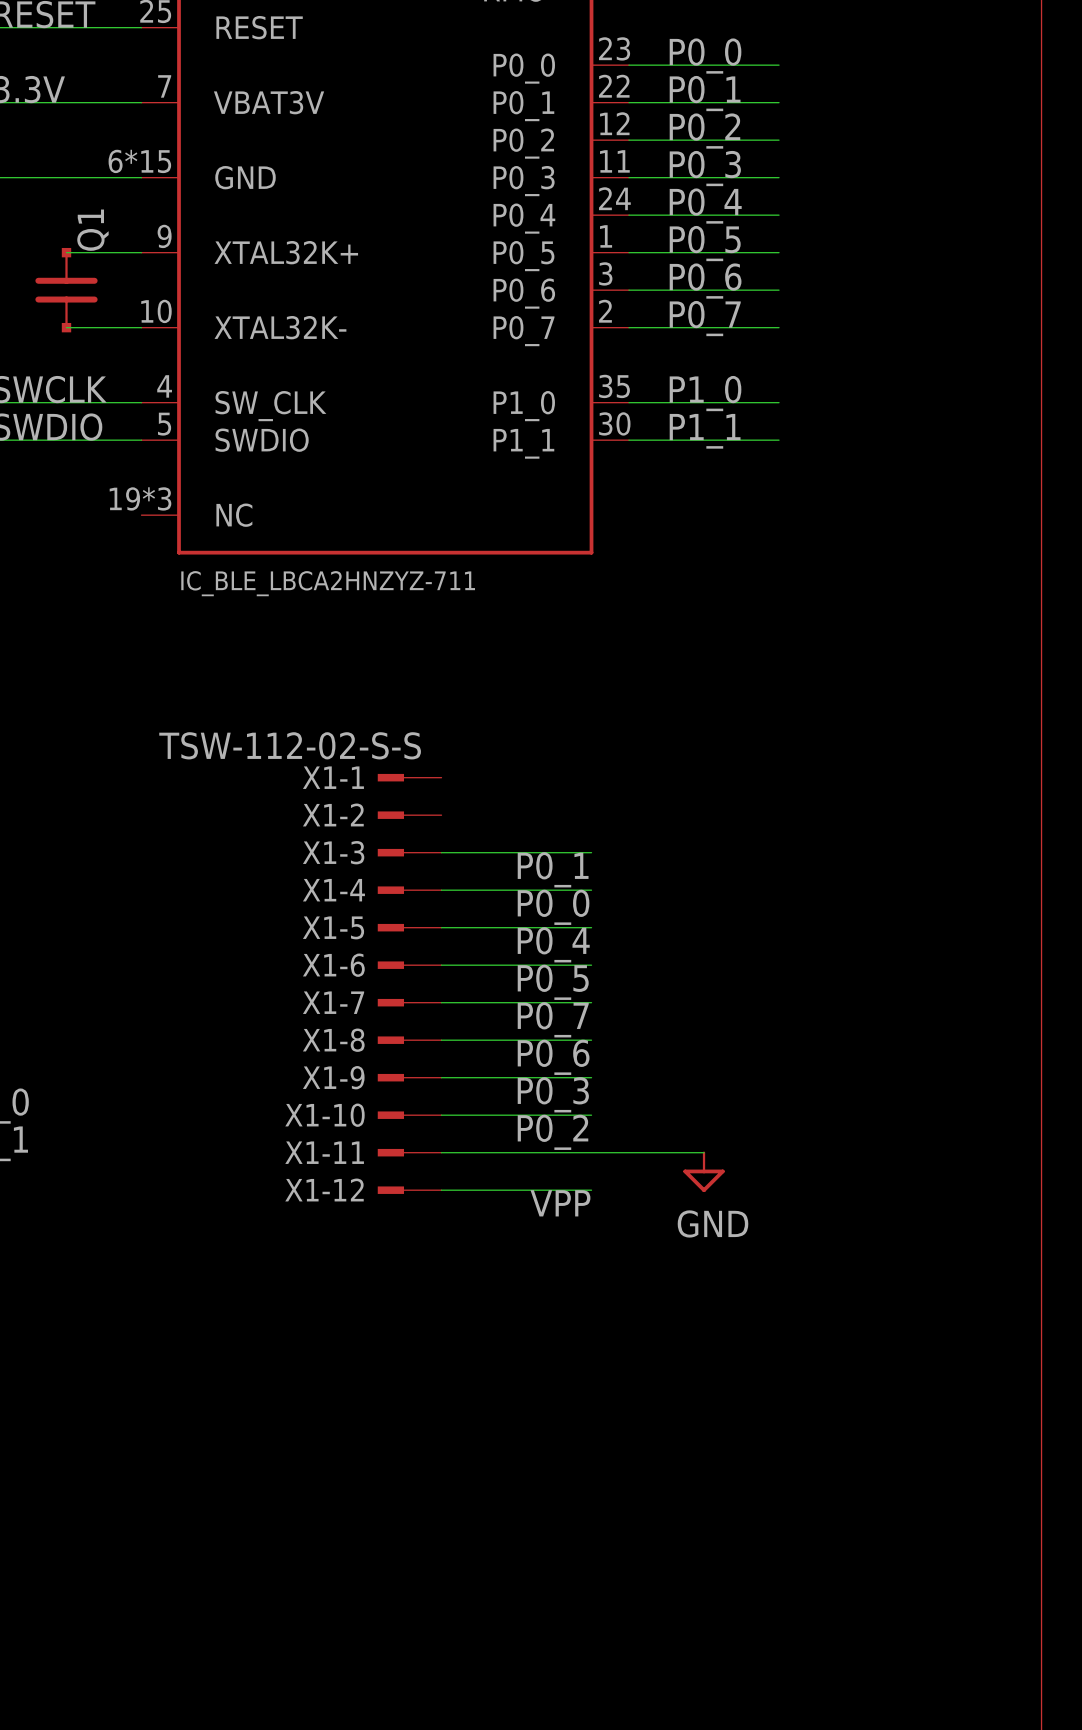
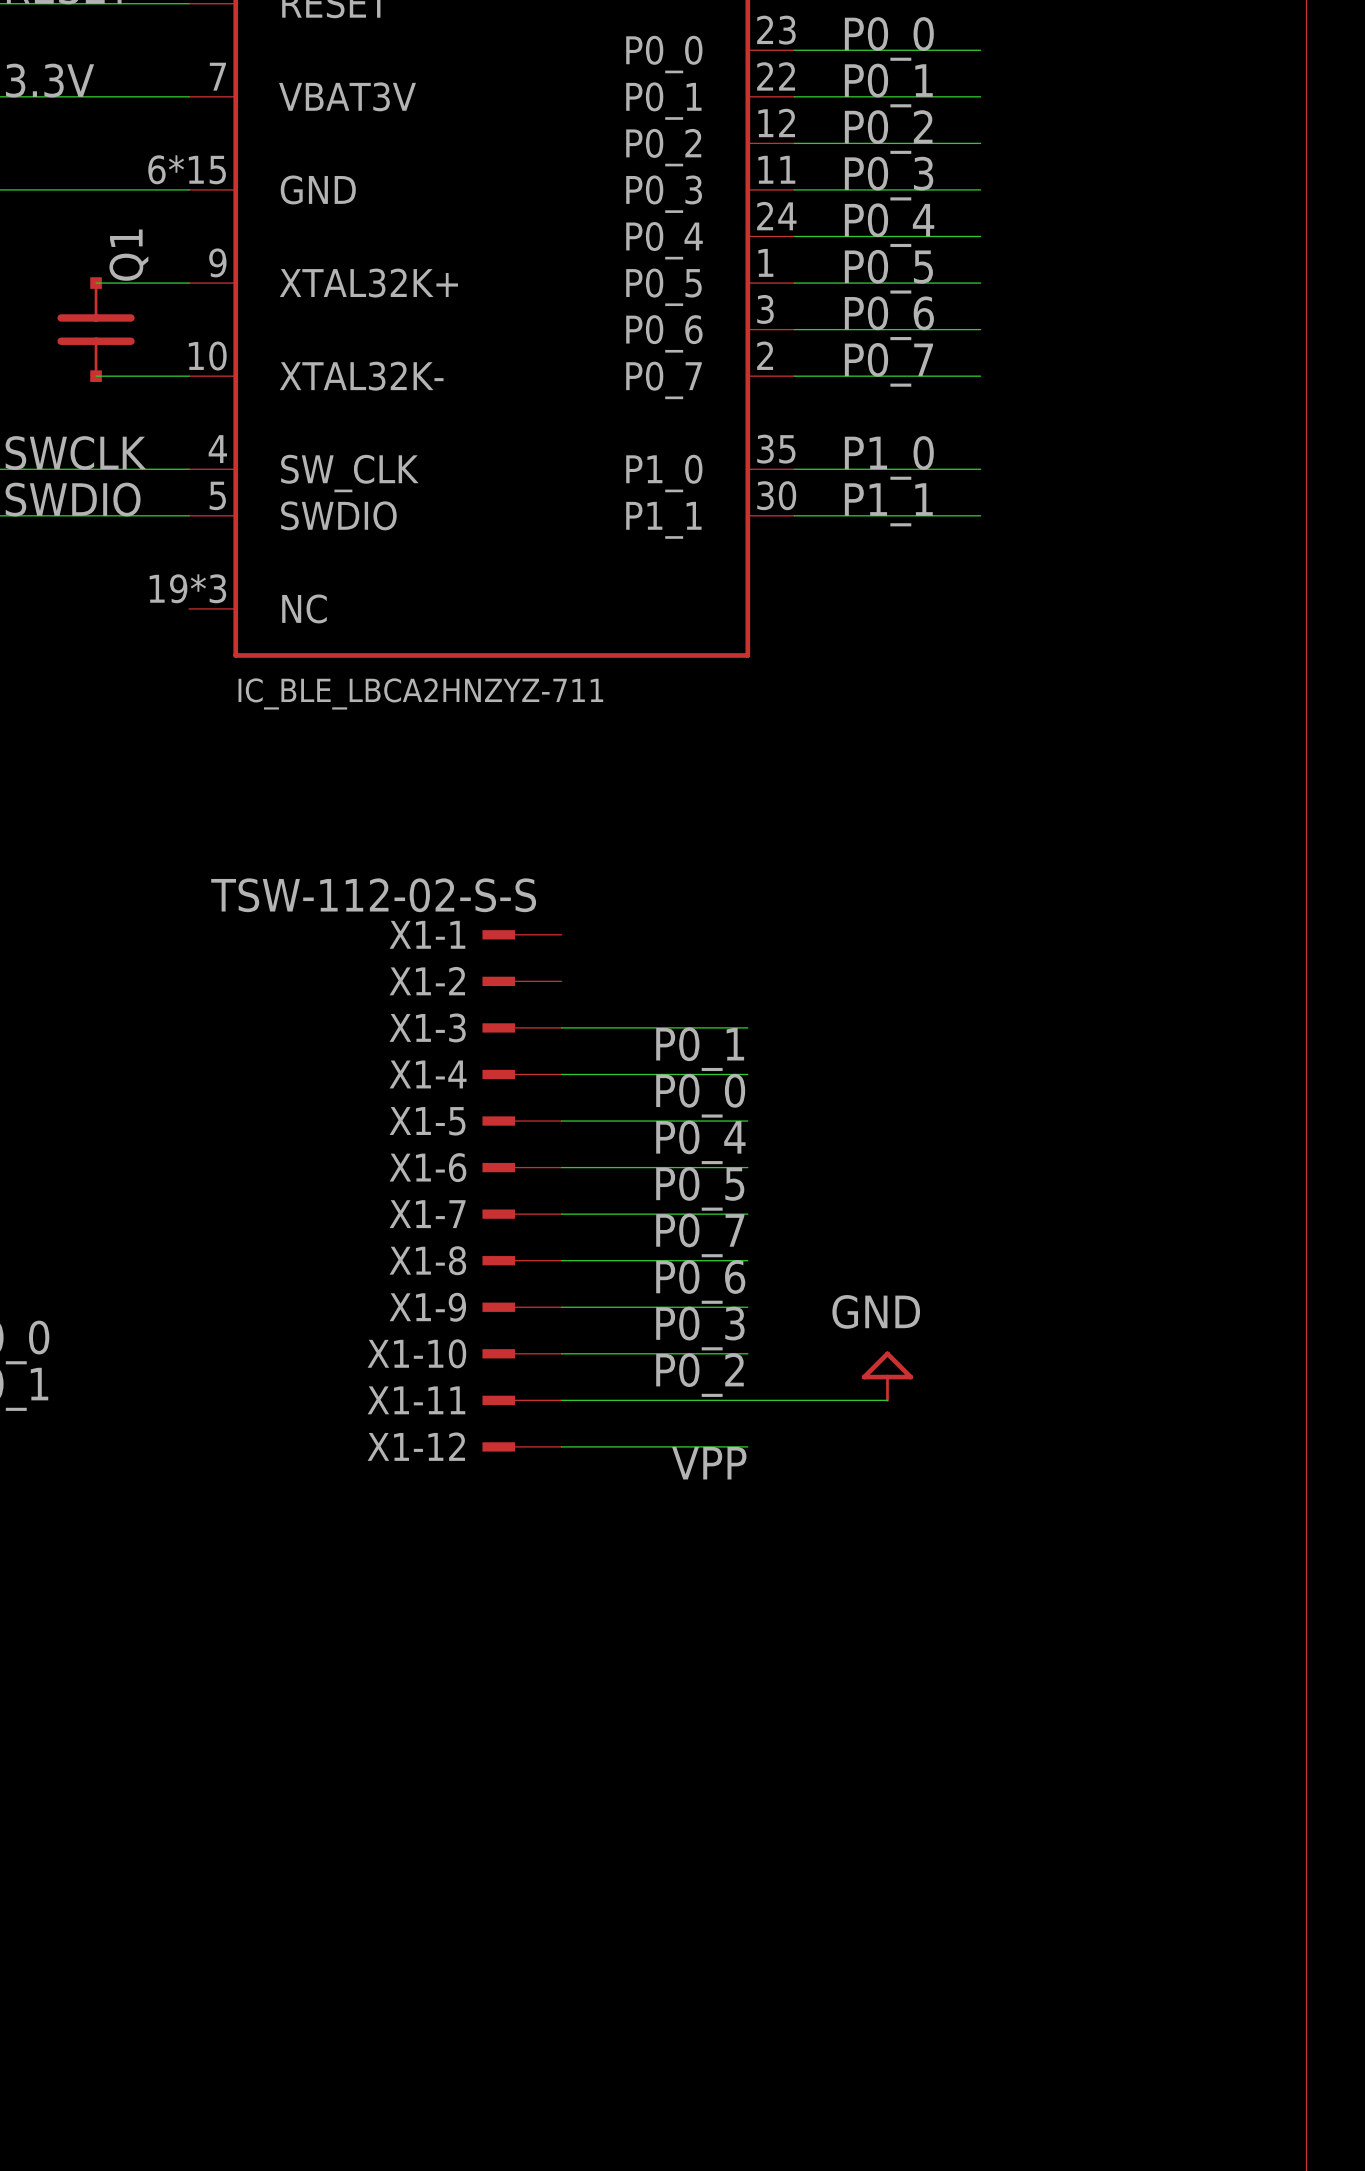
power symbol rotation: 0° (704, 1171) -> 180° (887, 1376)
power symbol position: GND (704, 1171) -> GND (887, 1376)

